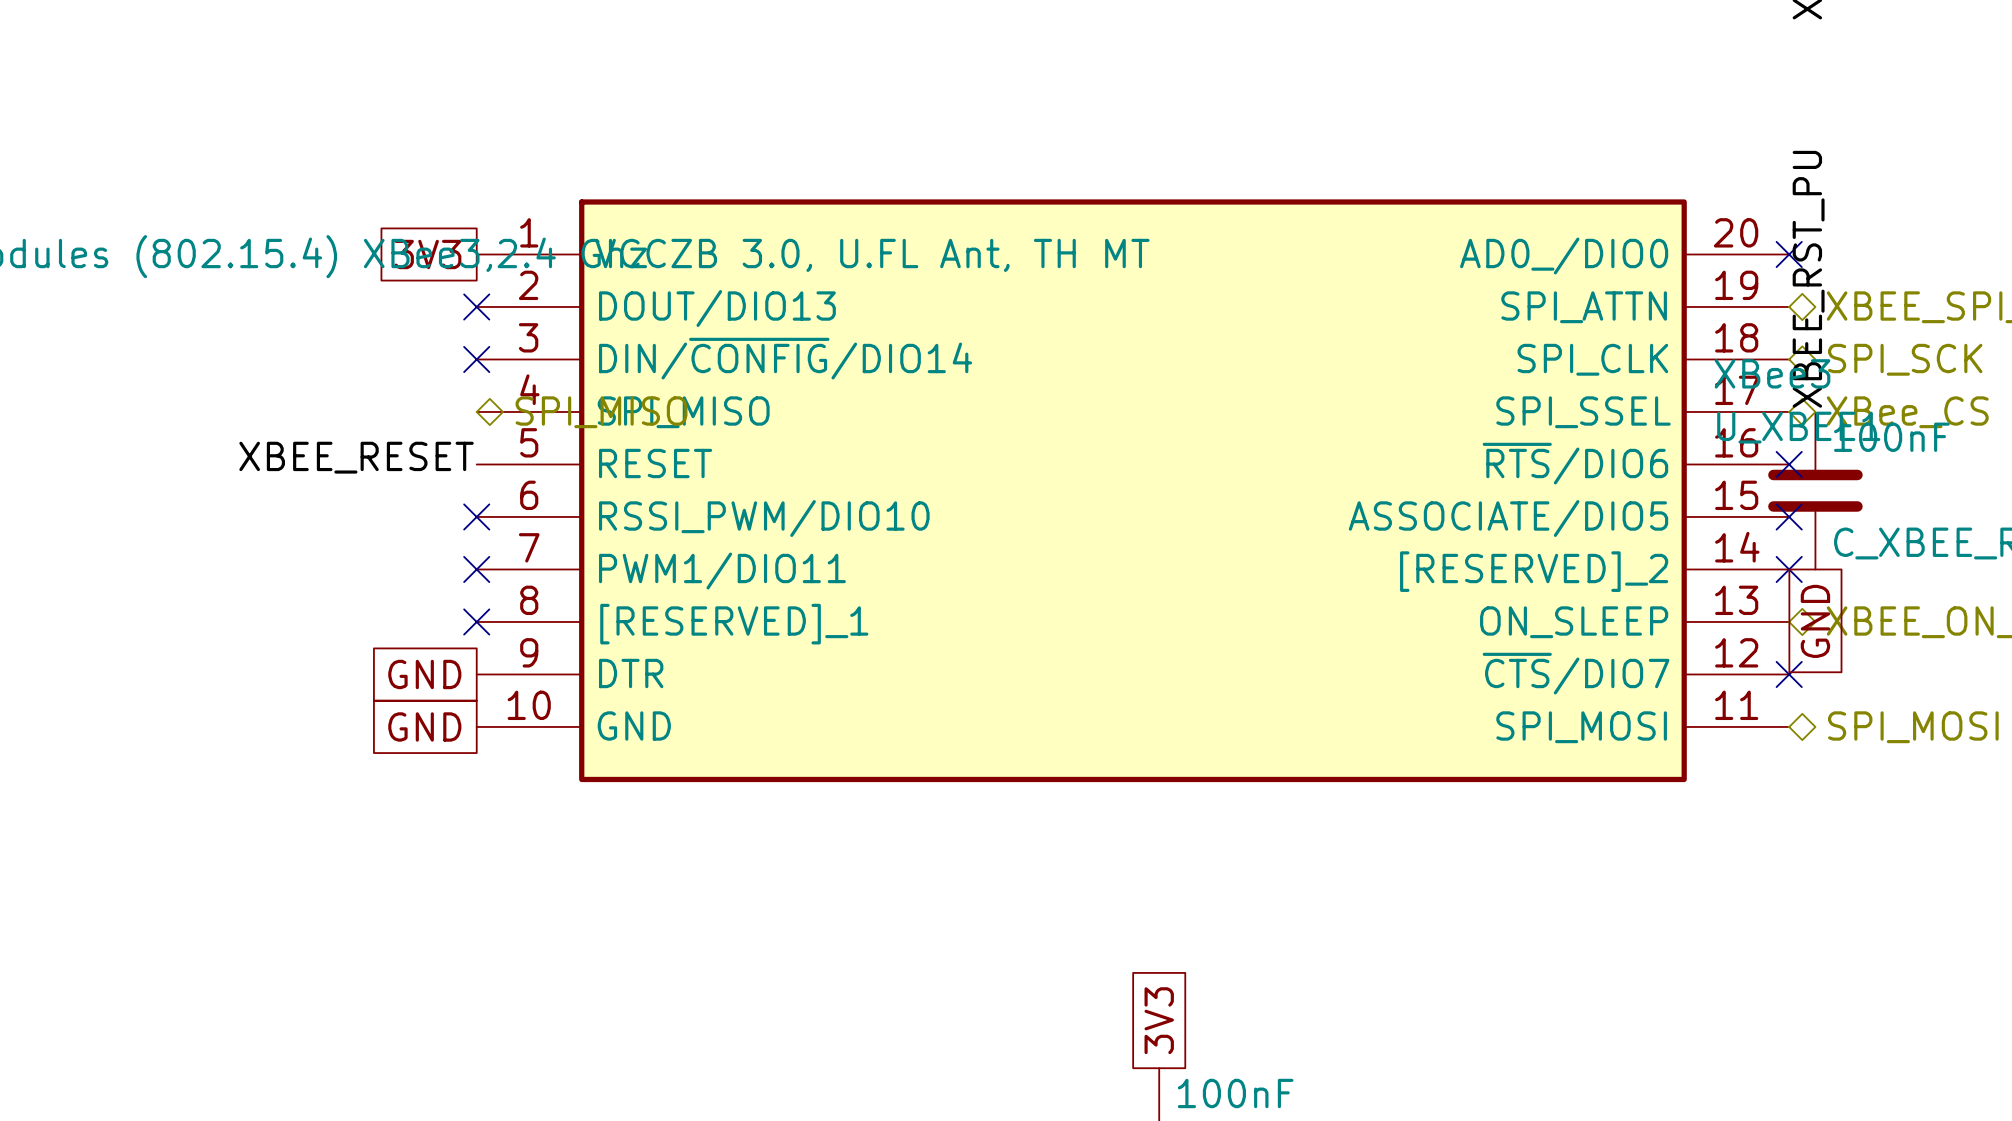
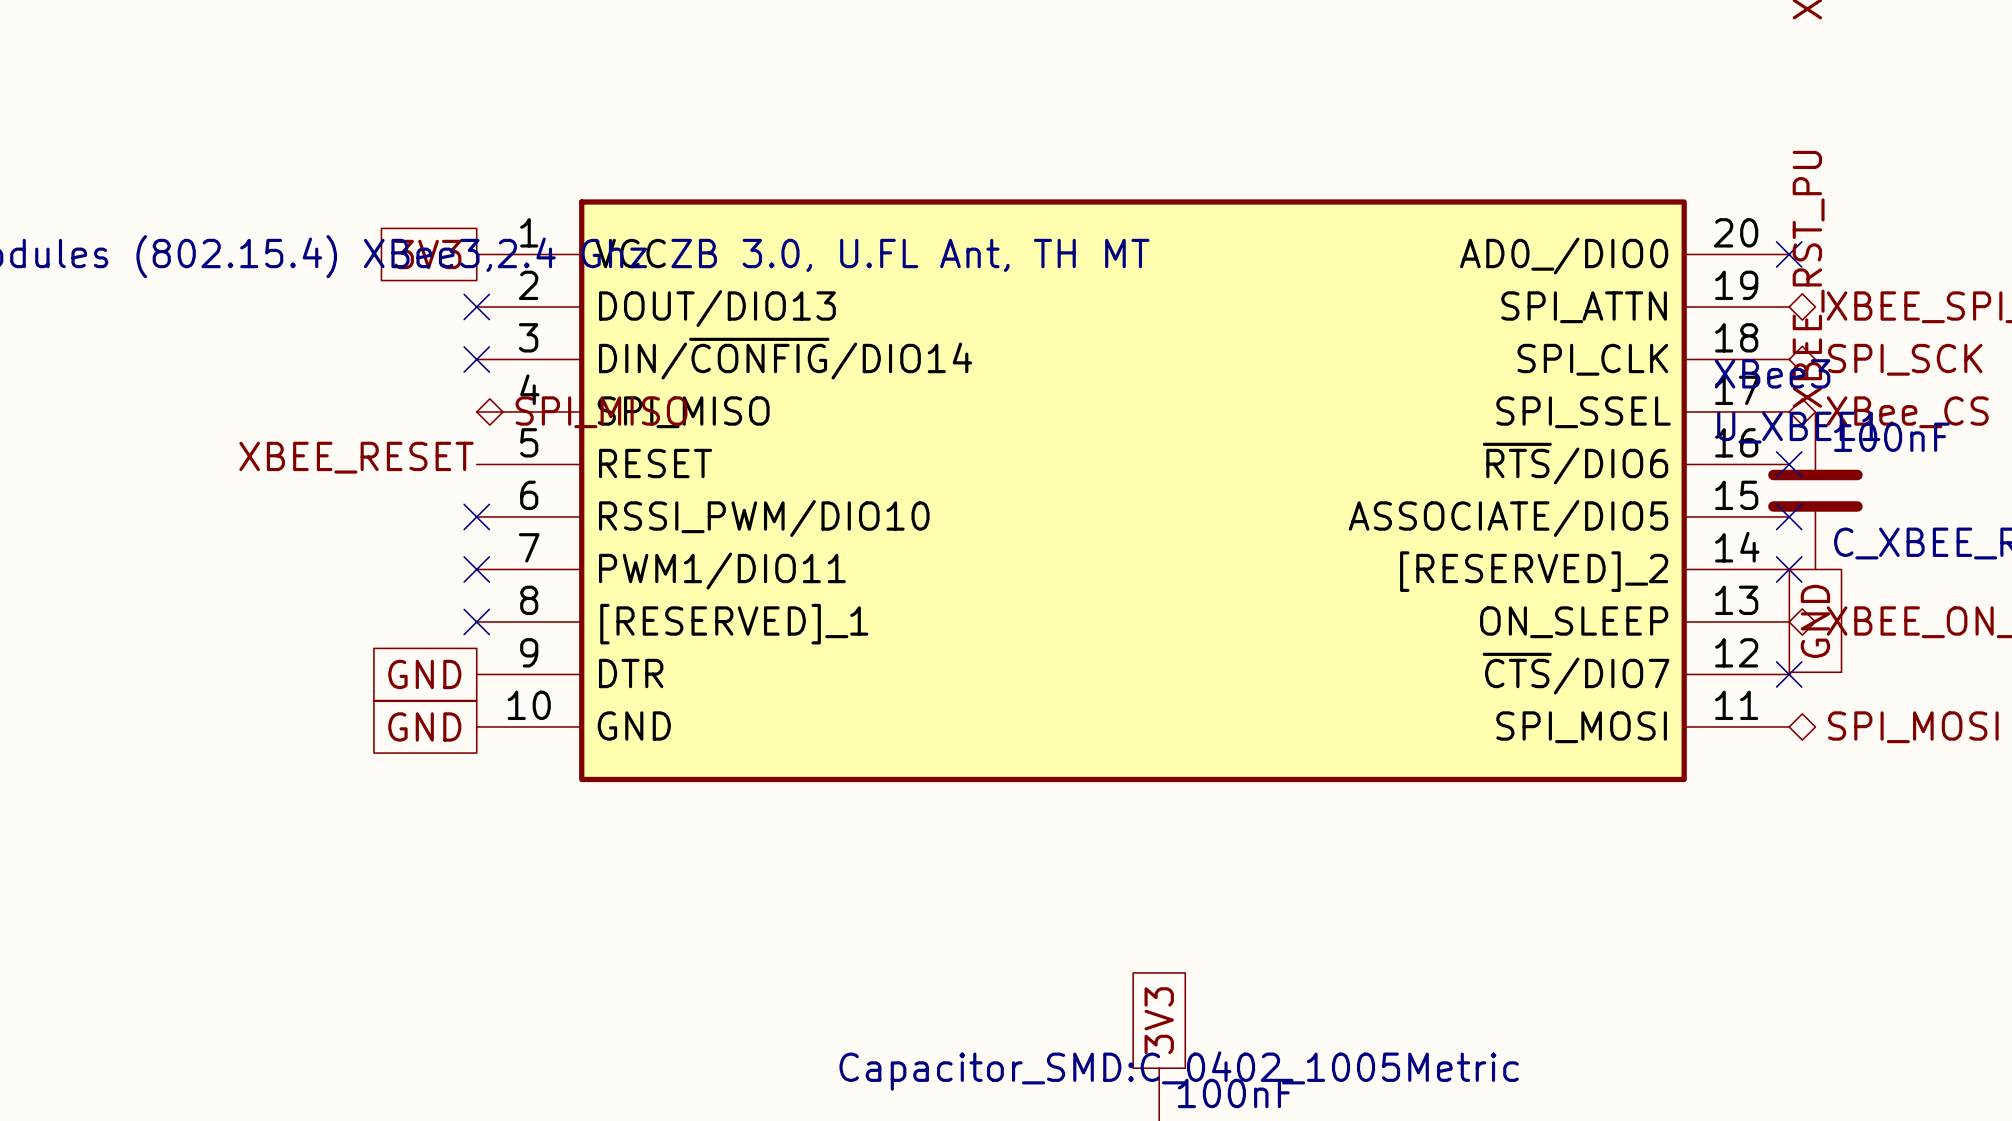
part text: none -> Capacitor_SMD:C_0402_1005Metric (1179, 1070)

